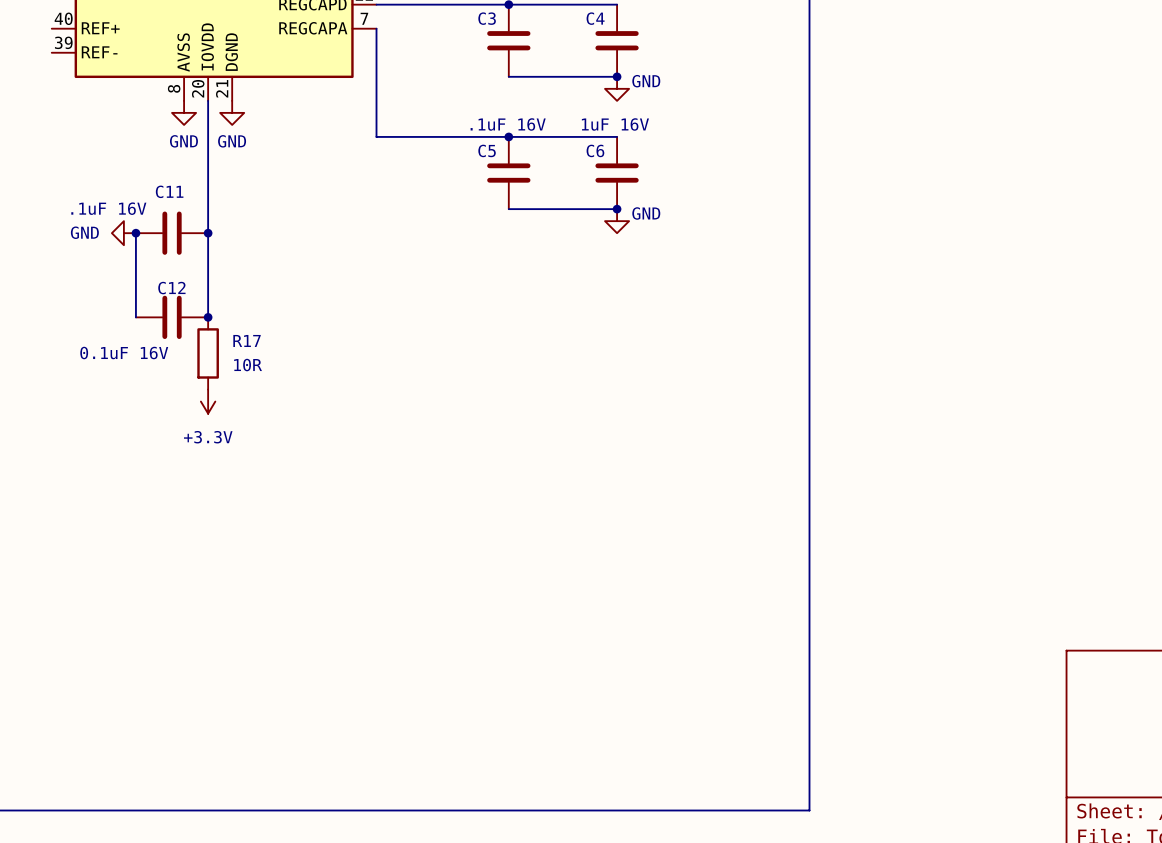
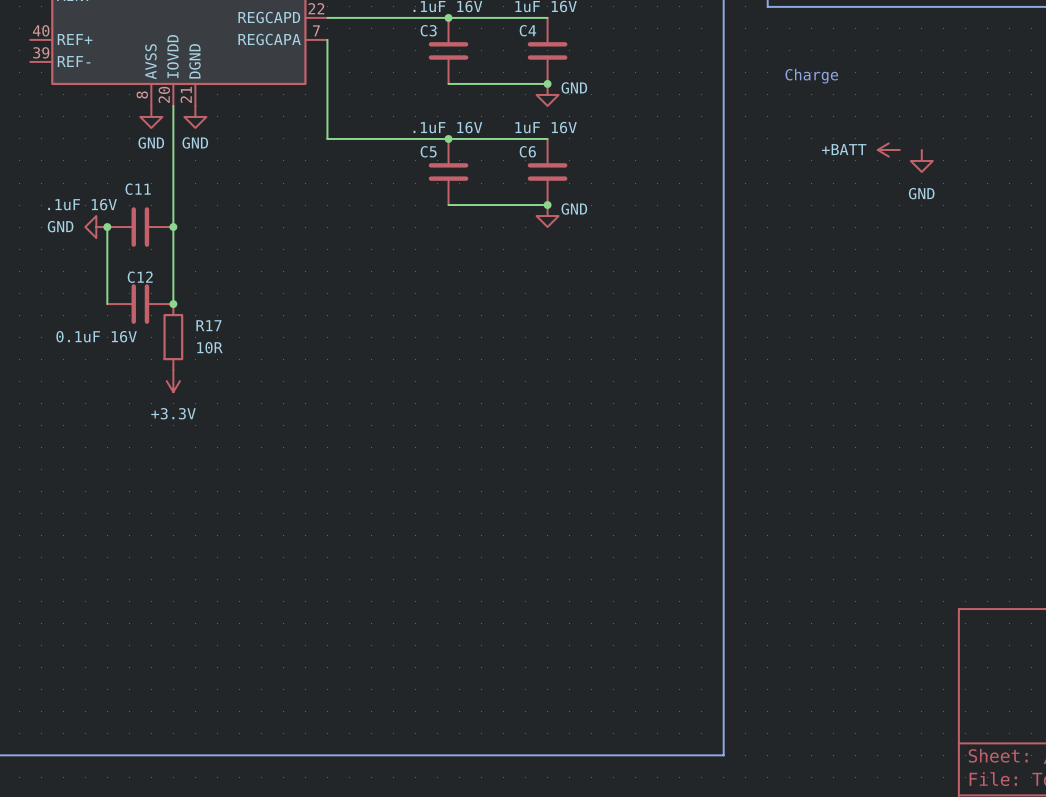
text: none -> Charge (811, 76)
power symbol: none -> +BATT (888, 149)
power symbol: none -> GND (921, 160)

